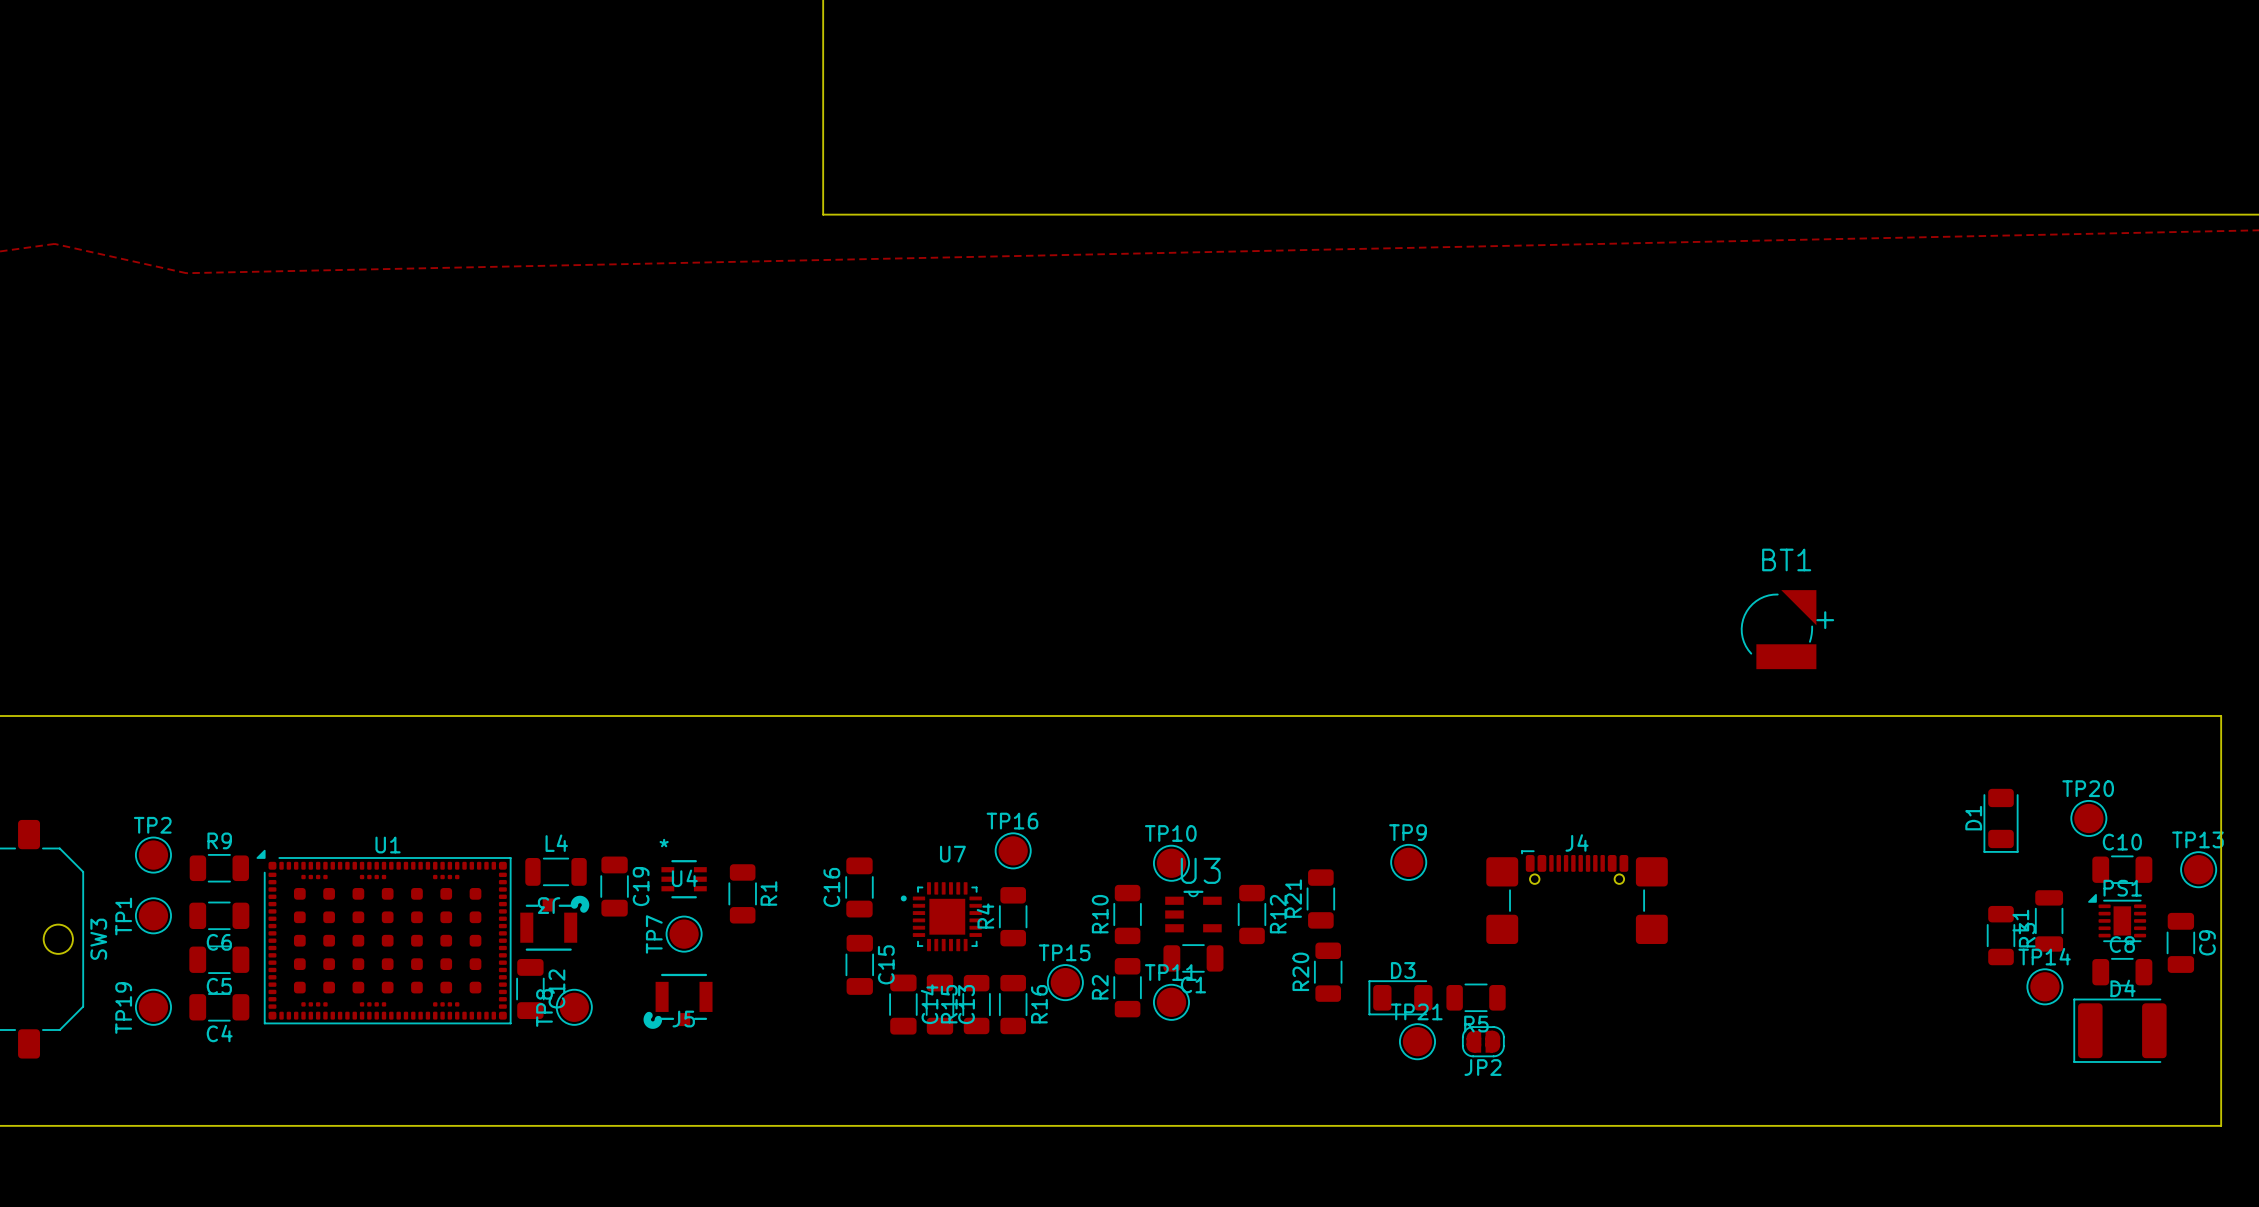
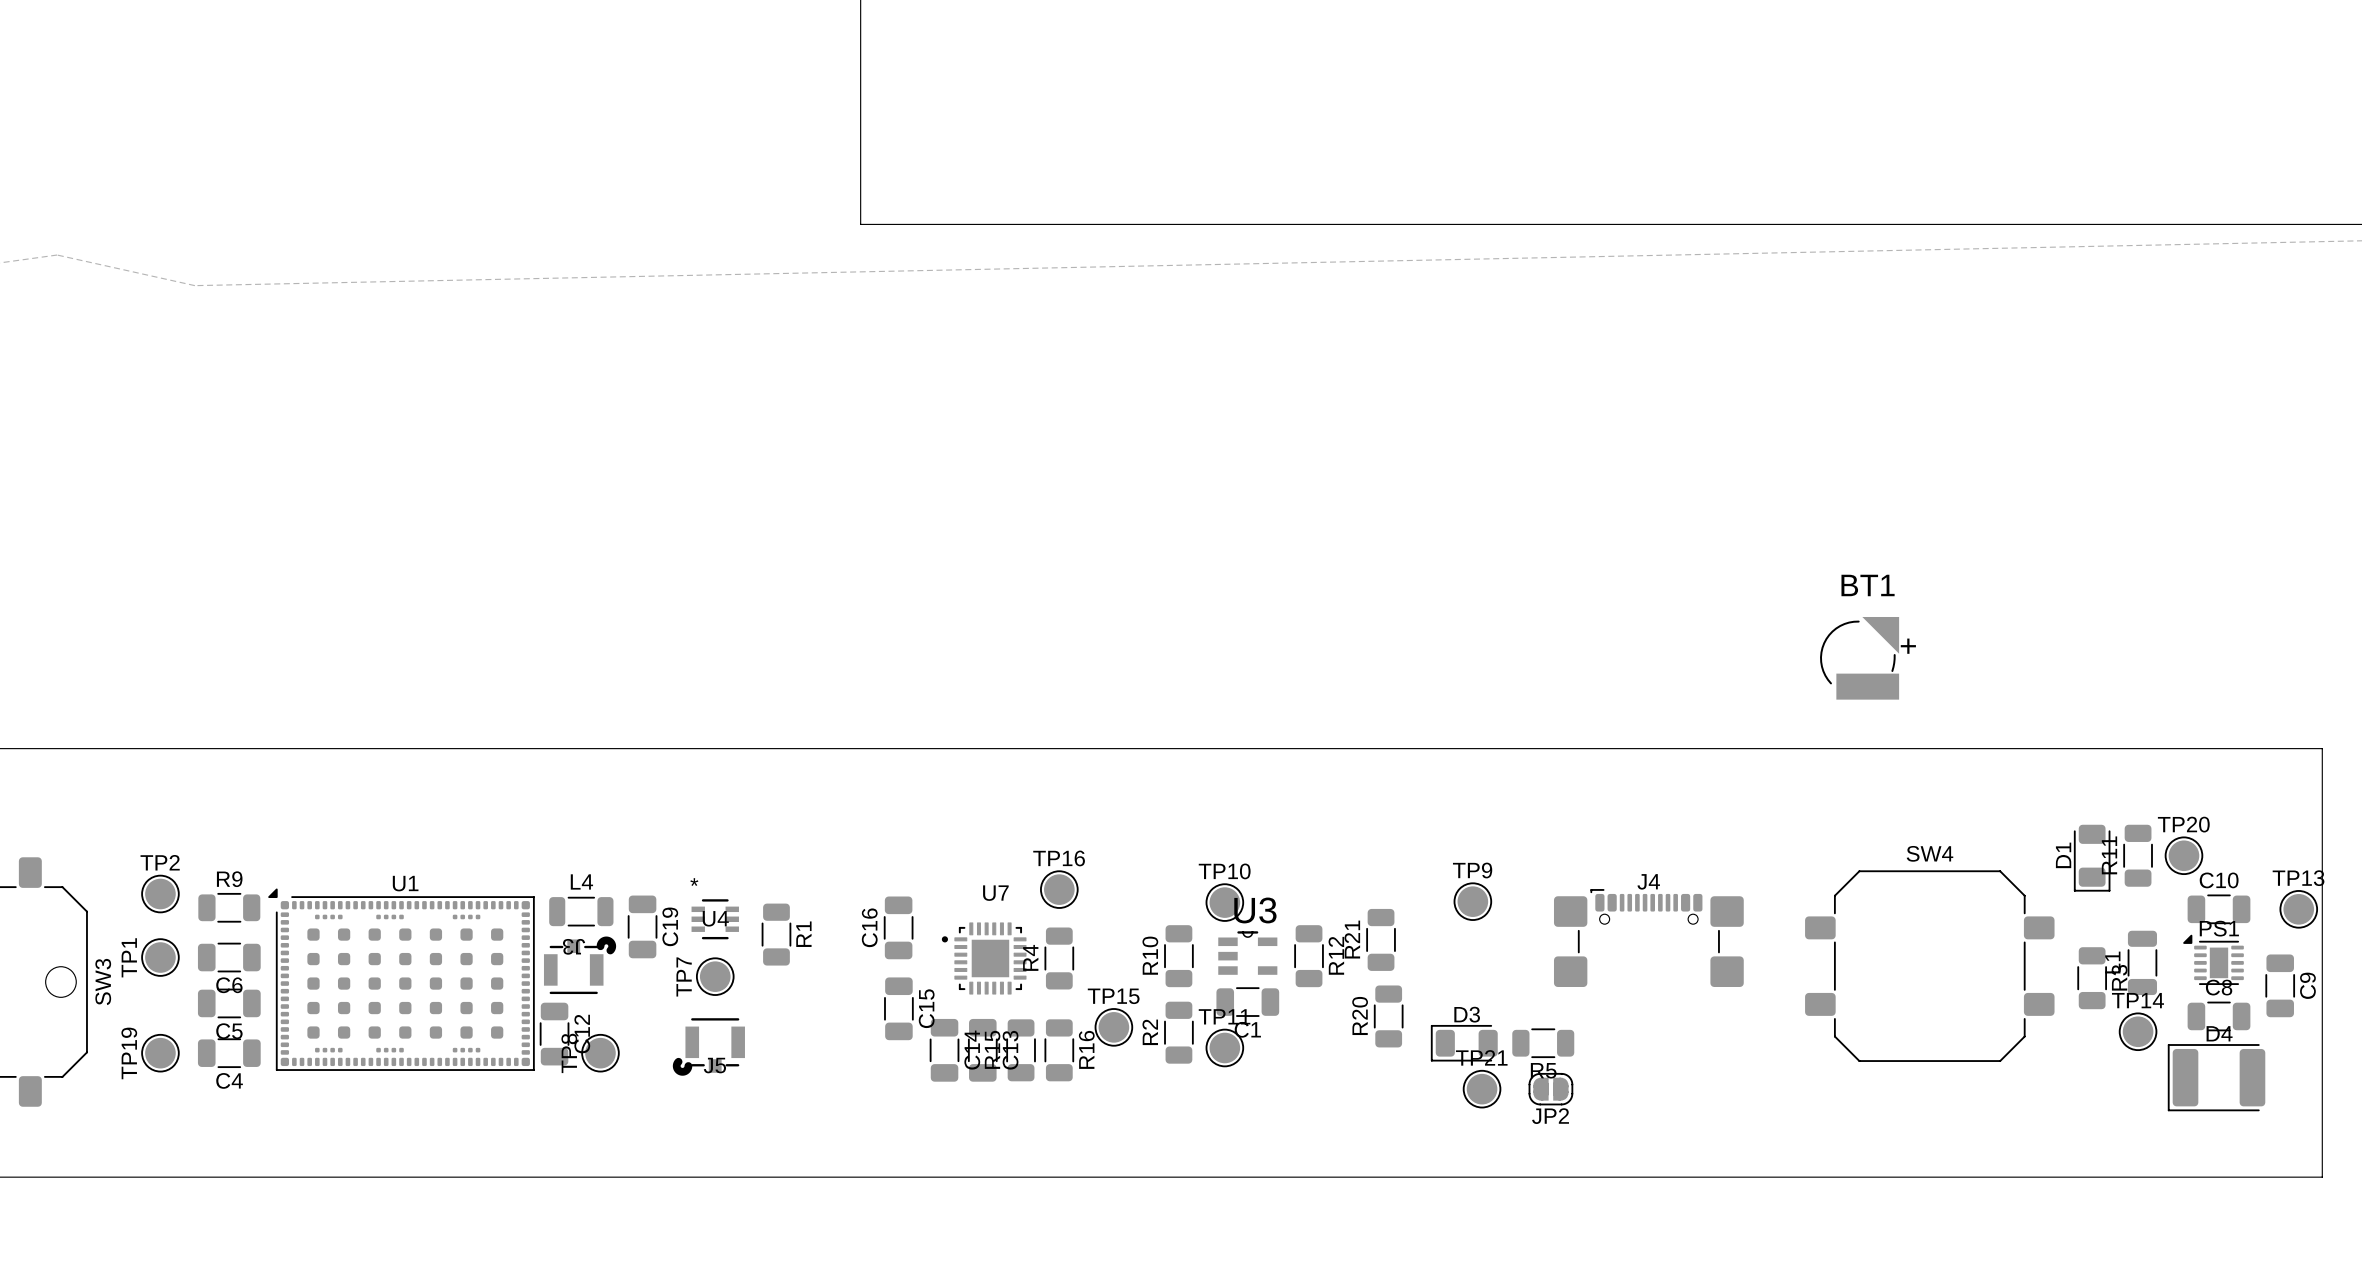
R11: none -> (2138, 855)
SW4: none -> (1929, 966)

